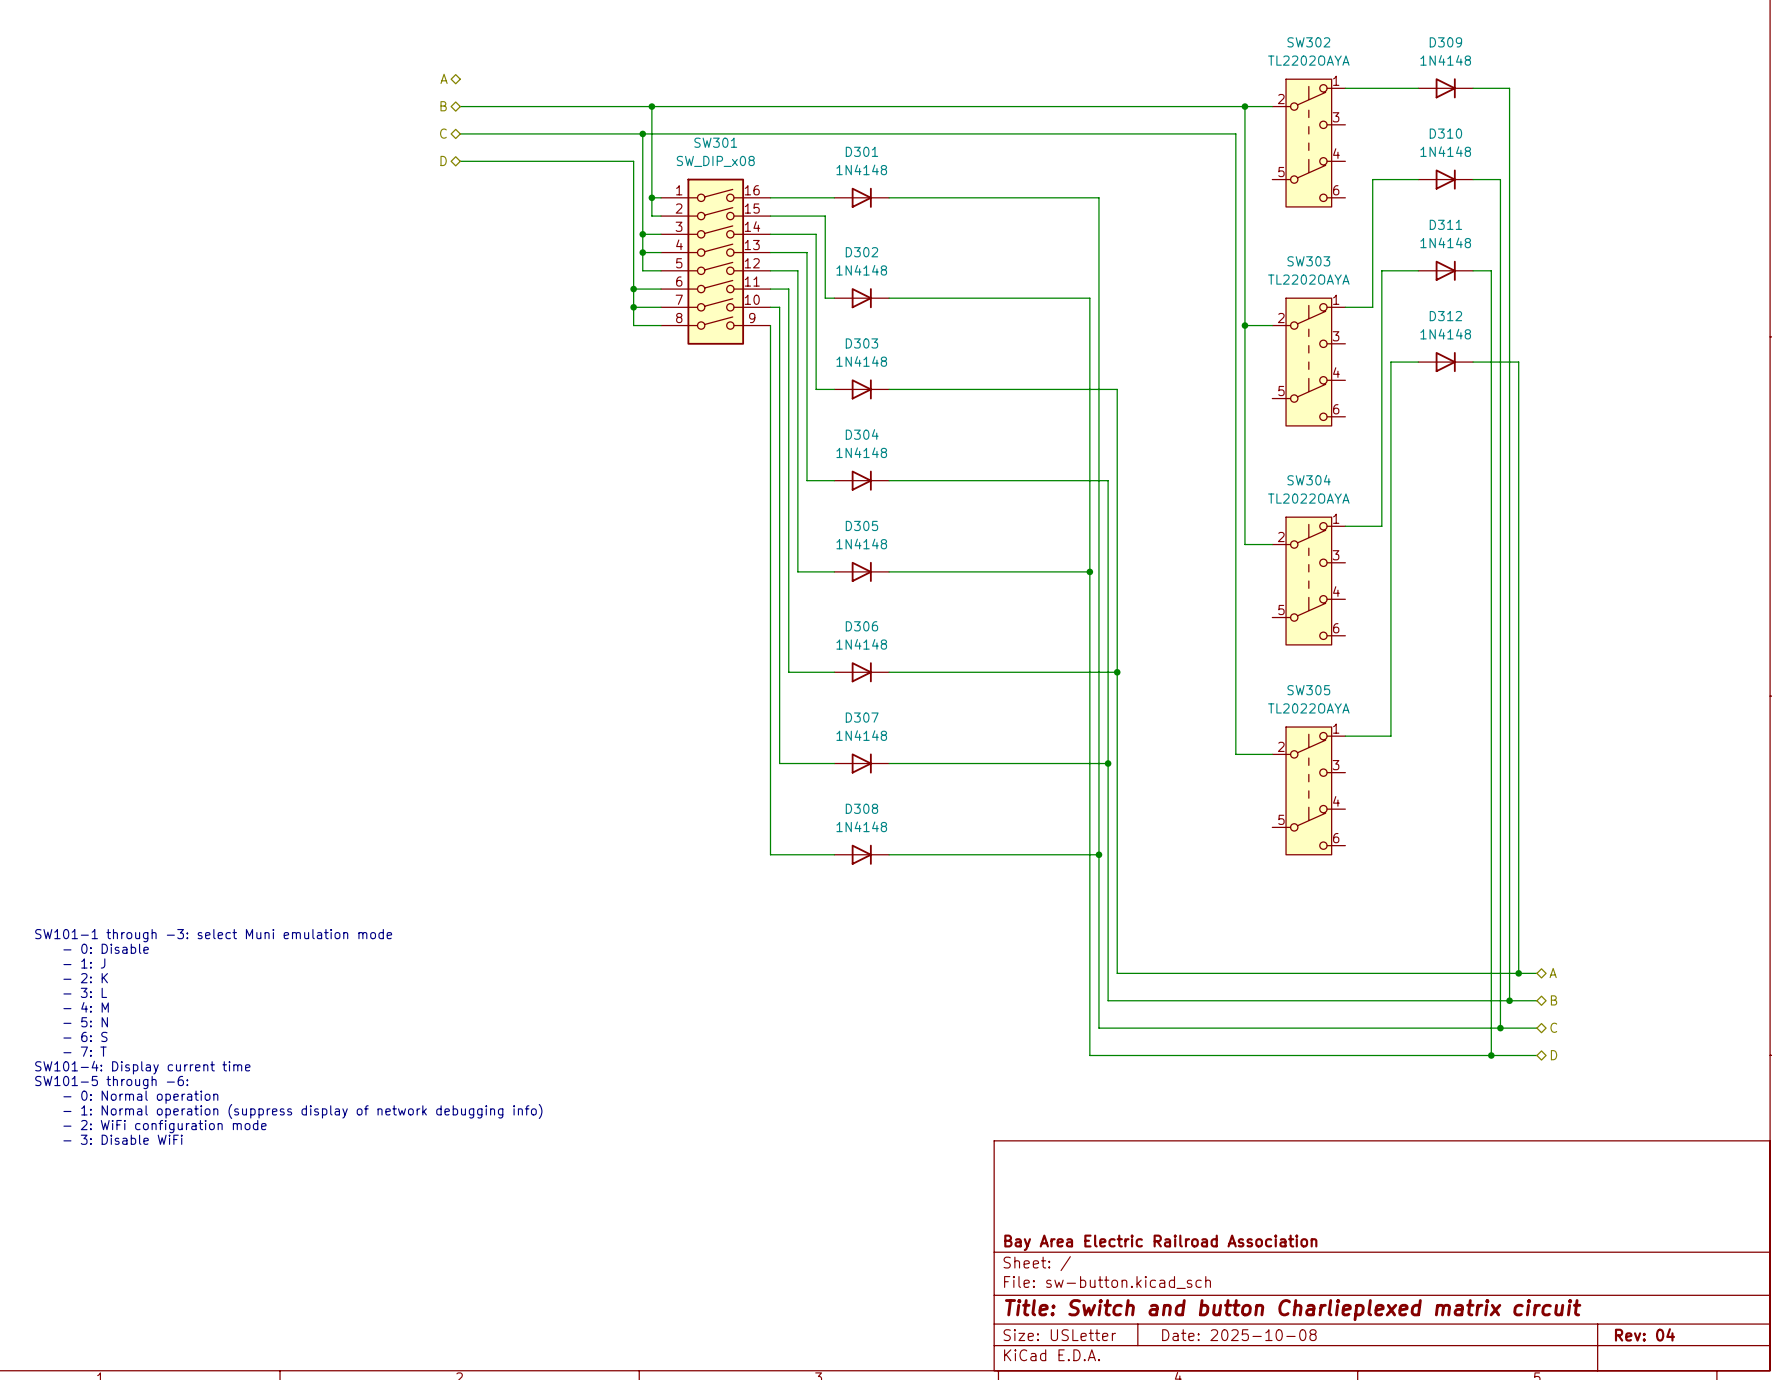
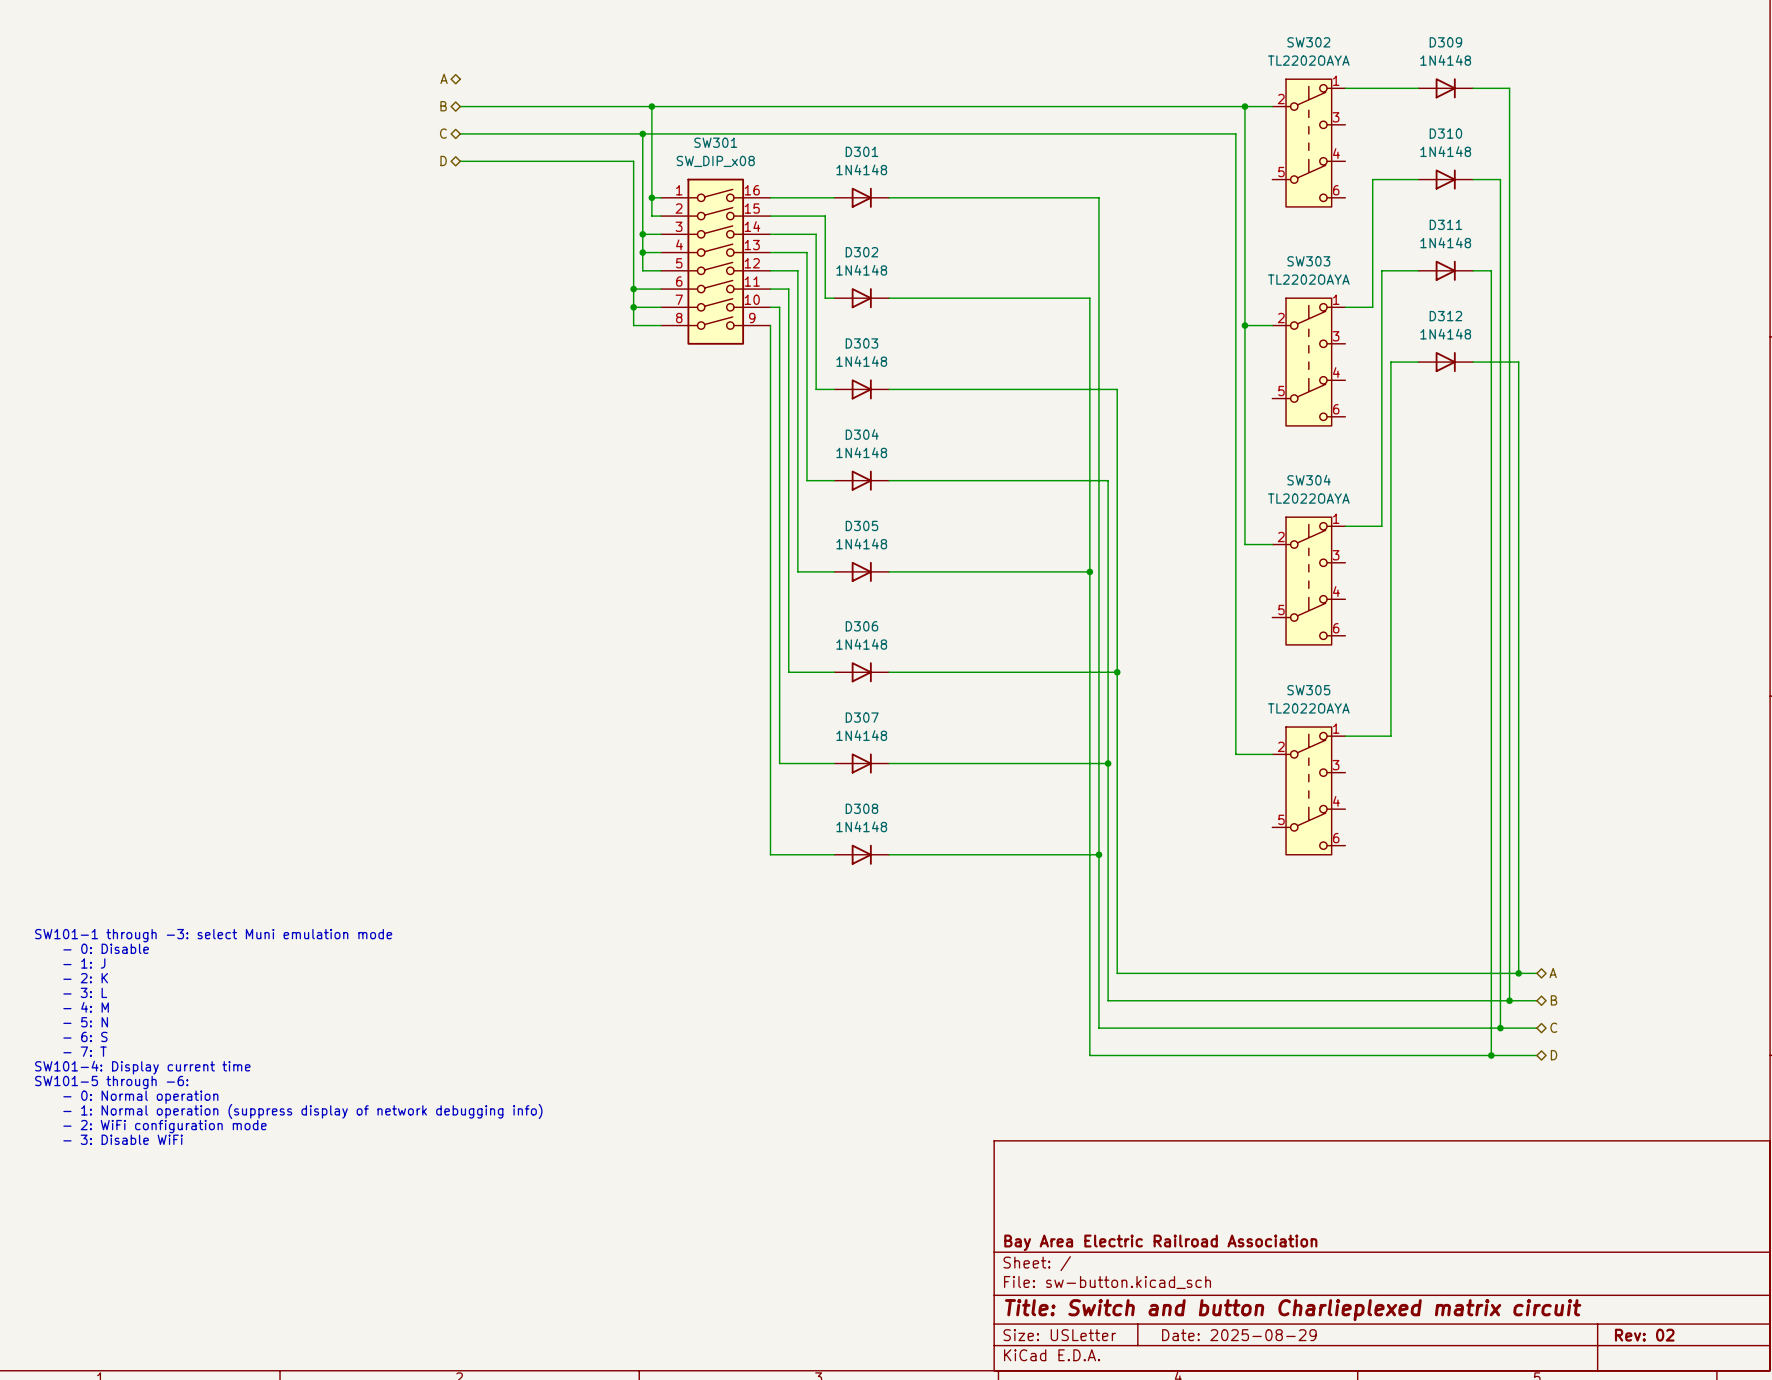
title block: Rev: 04 (1645, 1334) -> Rev: 02 (1644, 1335)
title block: Date: 2025-10-08 (1239, 1335) -> Date: 2025-08-29 (1239, 1335)

